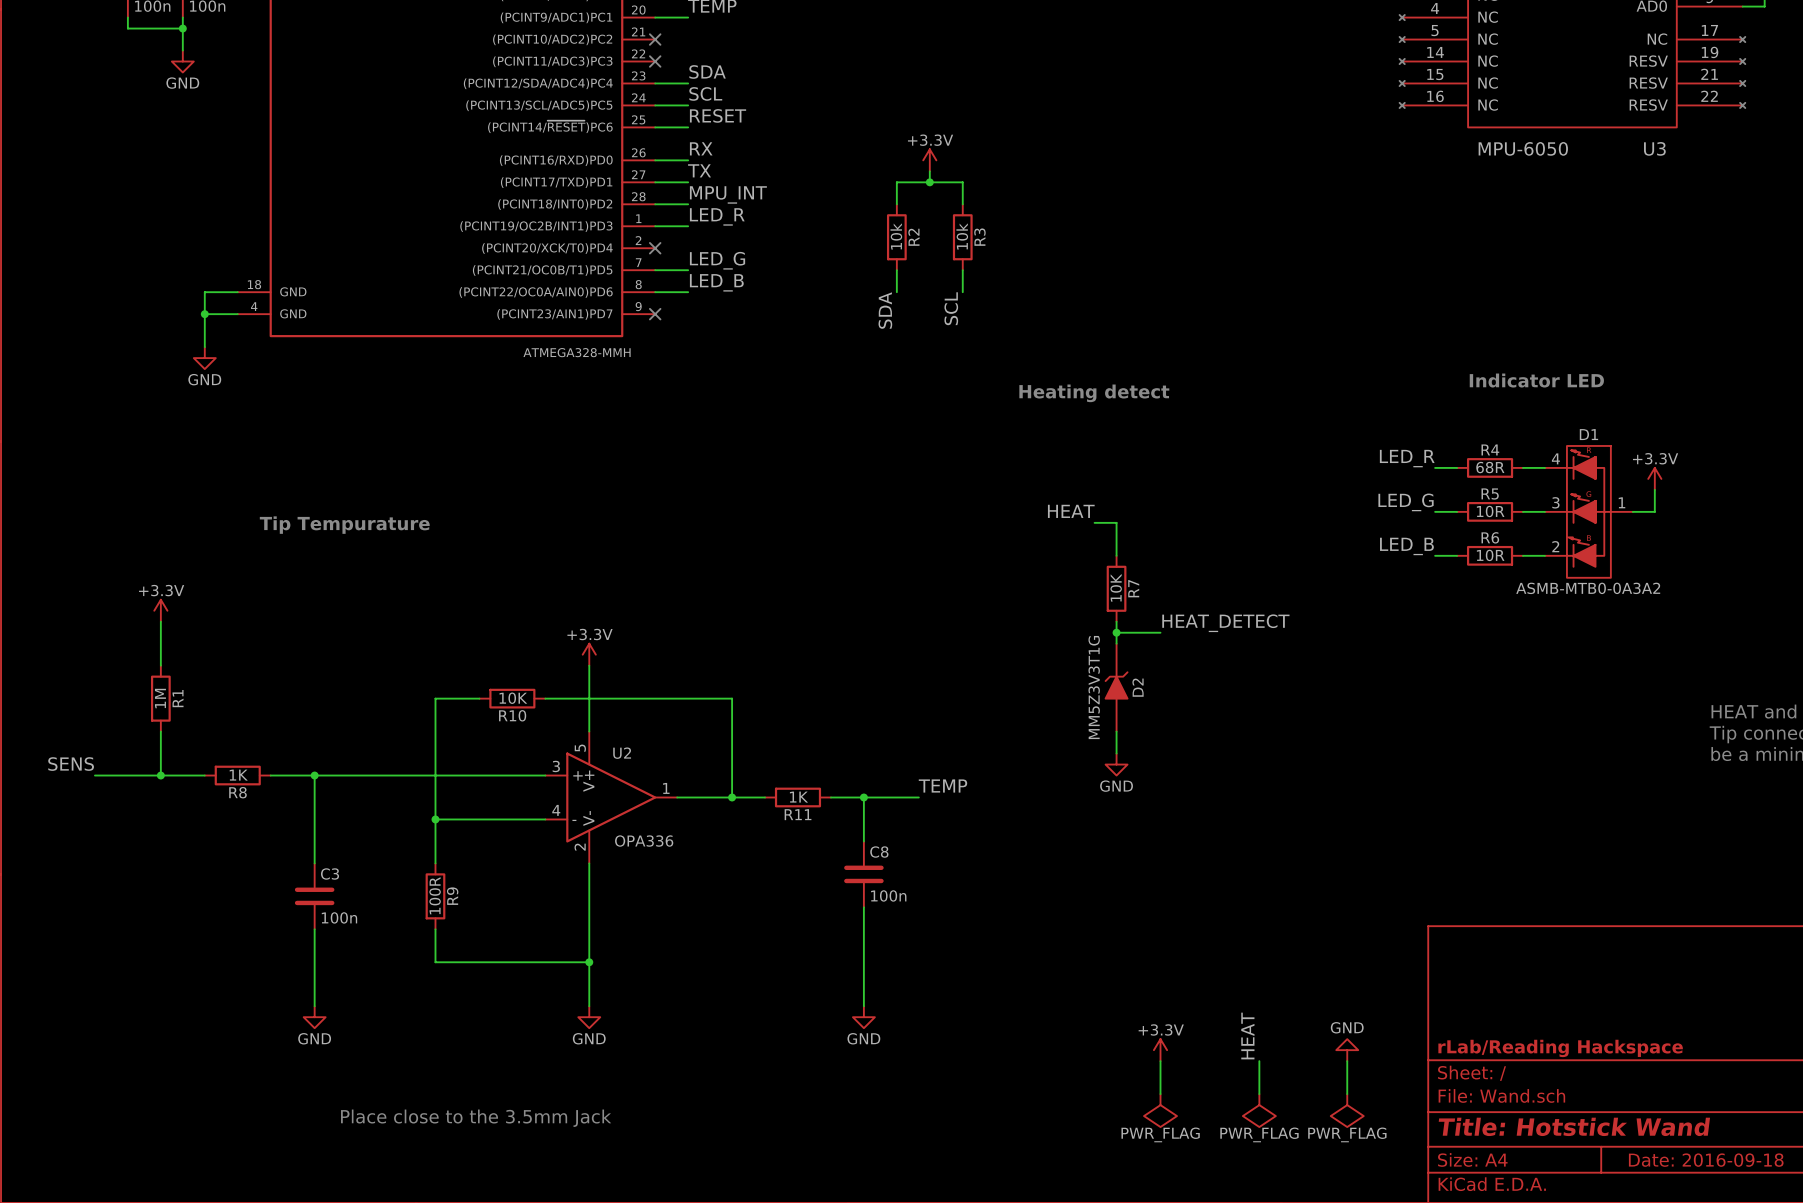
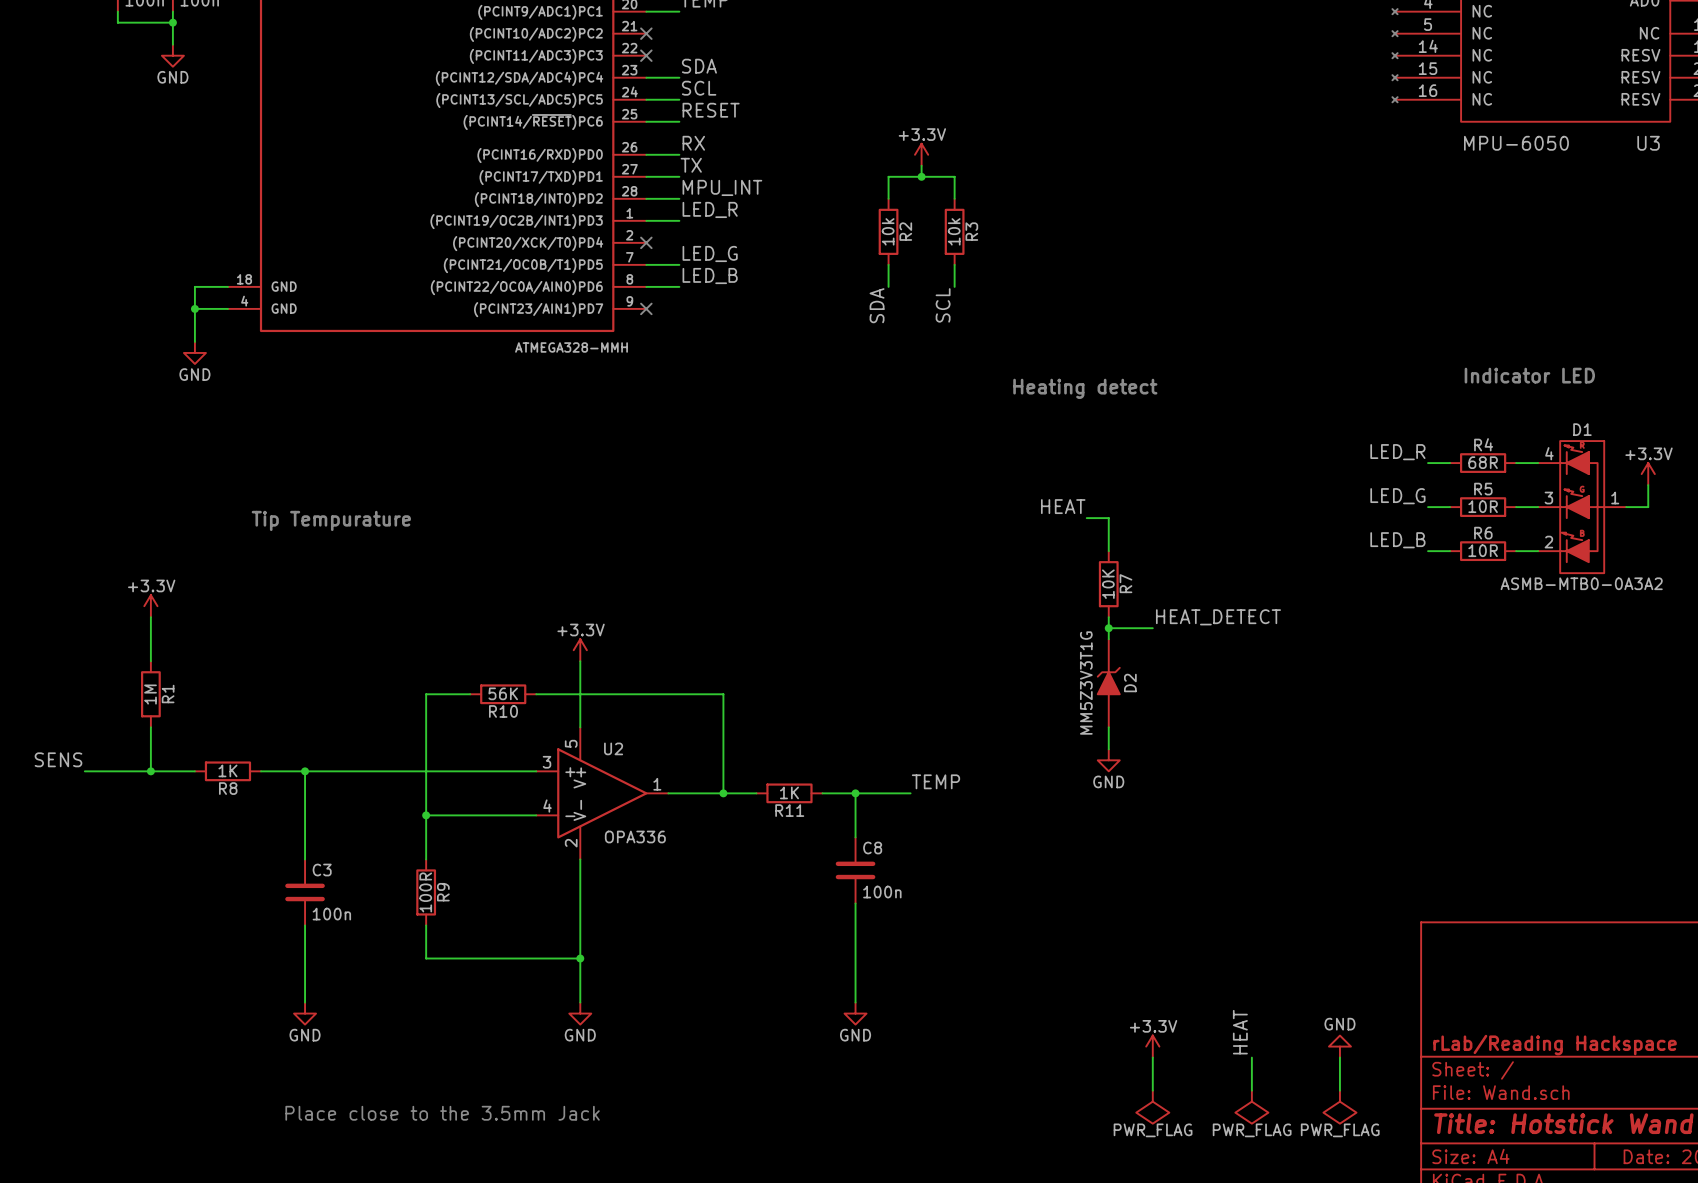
R10 value: 10K (513, 698) -> 56K (503, 693)

